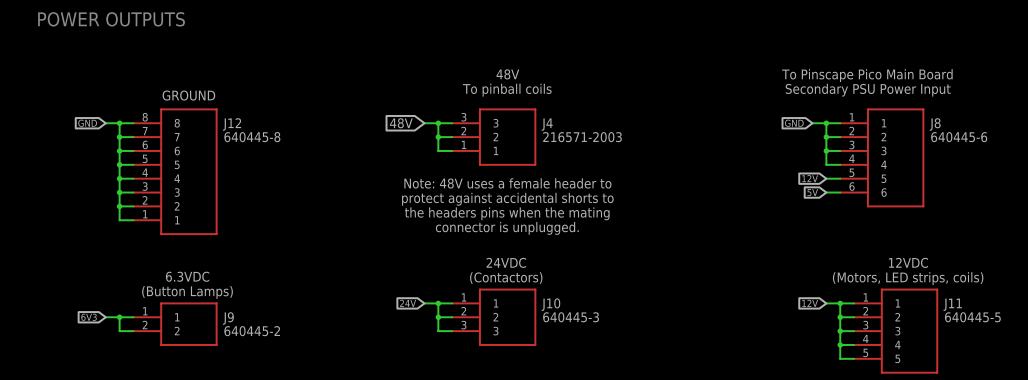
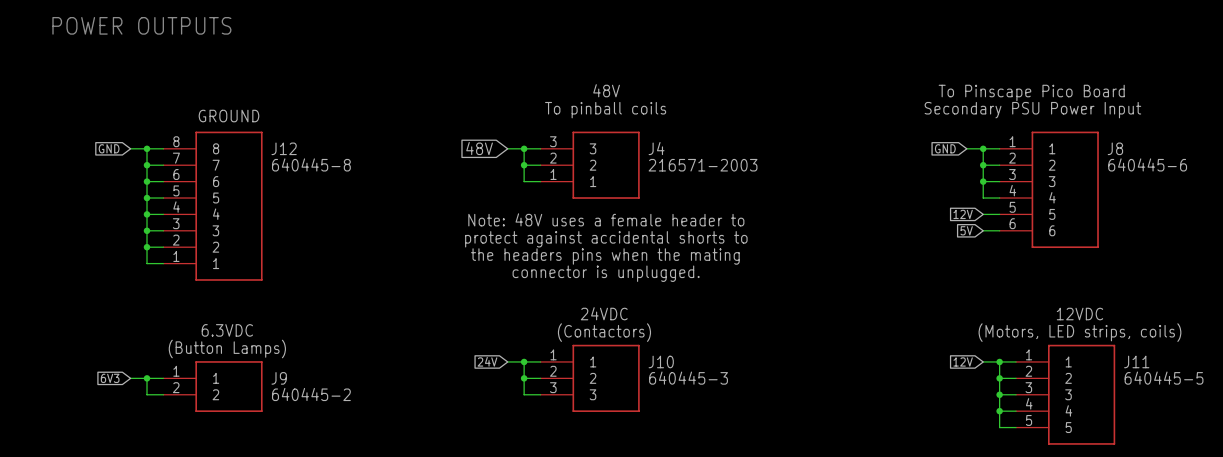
text: To Pinscape Pico Main Board (867, 75) -> To Pinscape Pico Board (1031, 92)

